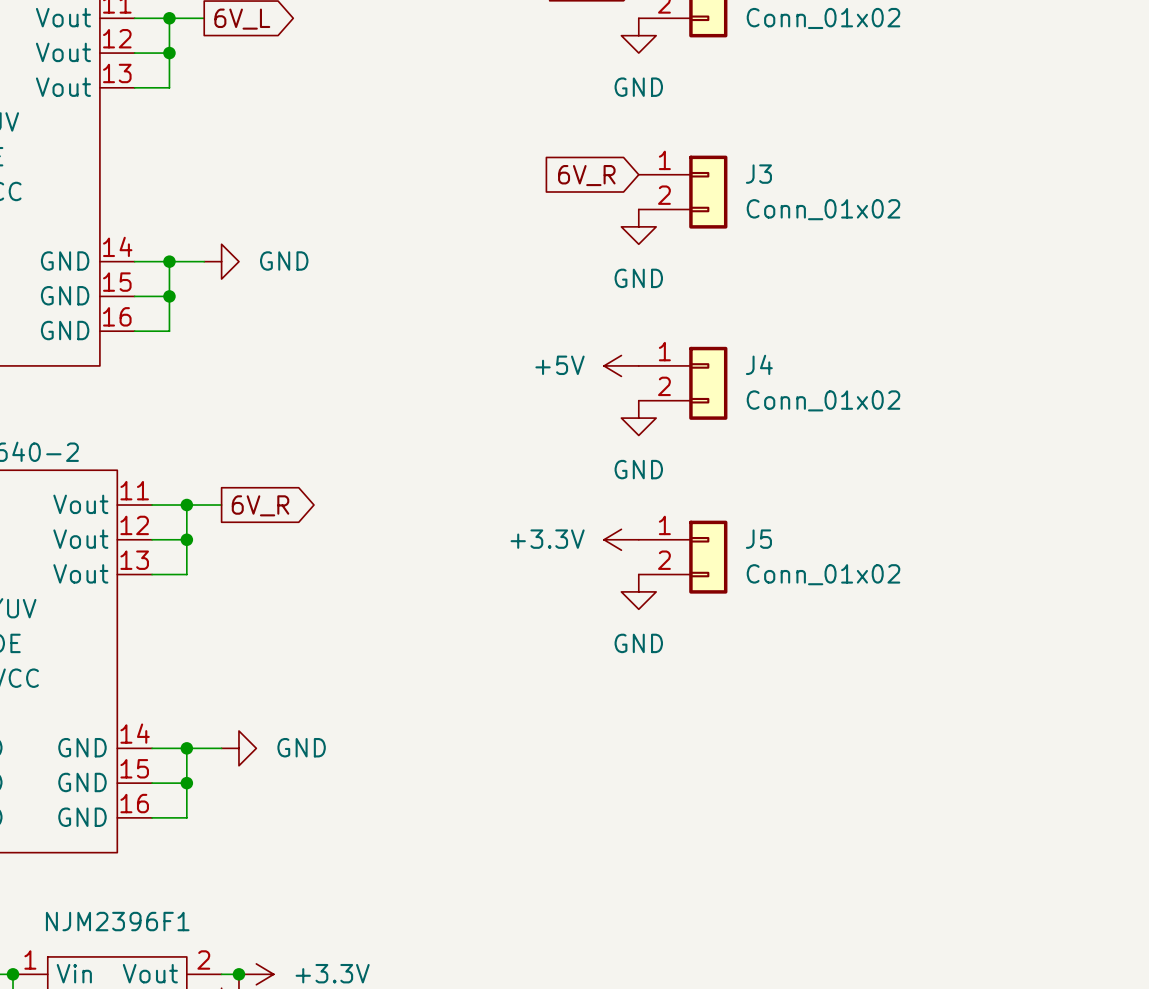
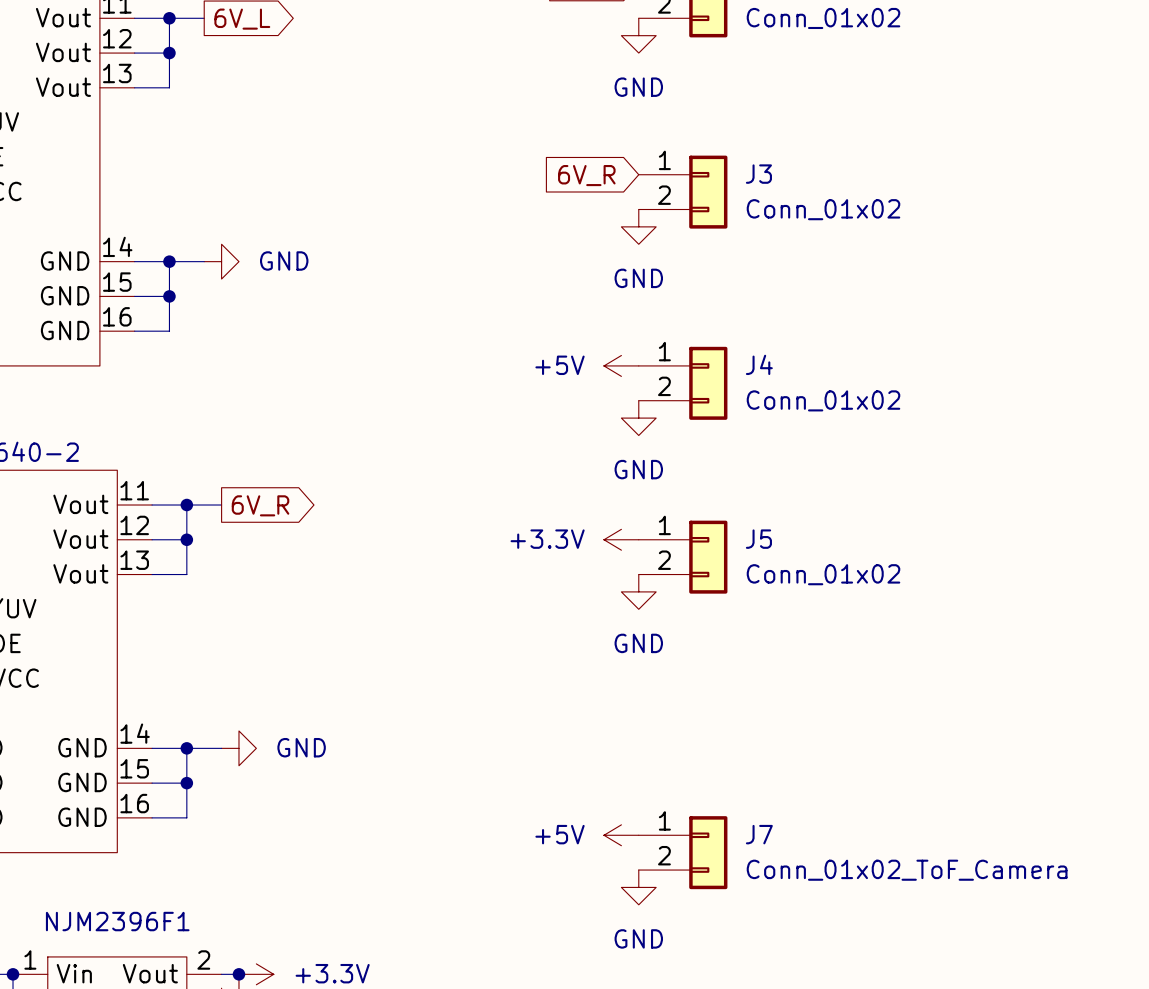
power symbol: none -> +5V (621, 835)
J7: none -> Conn_01x02_ToF_Camera (683, 852)
power symbol: none -> GND (638, 887)

